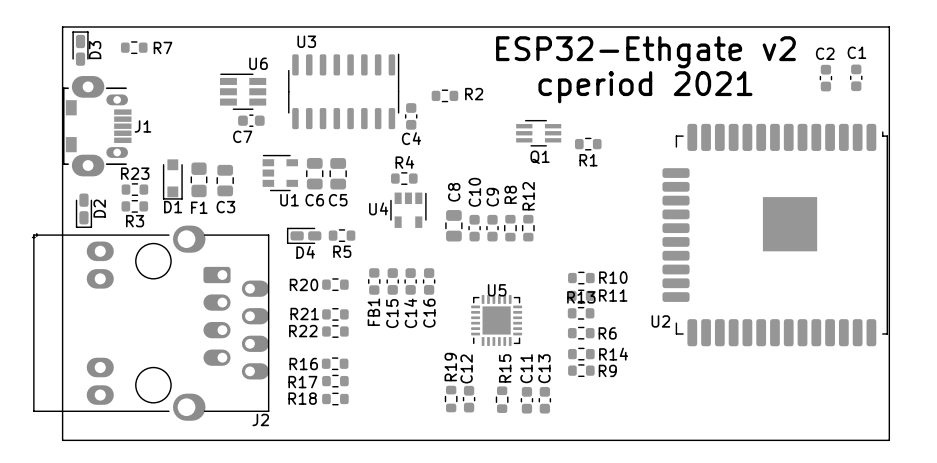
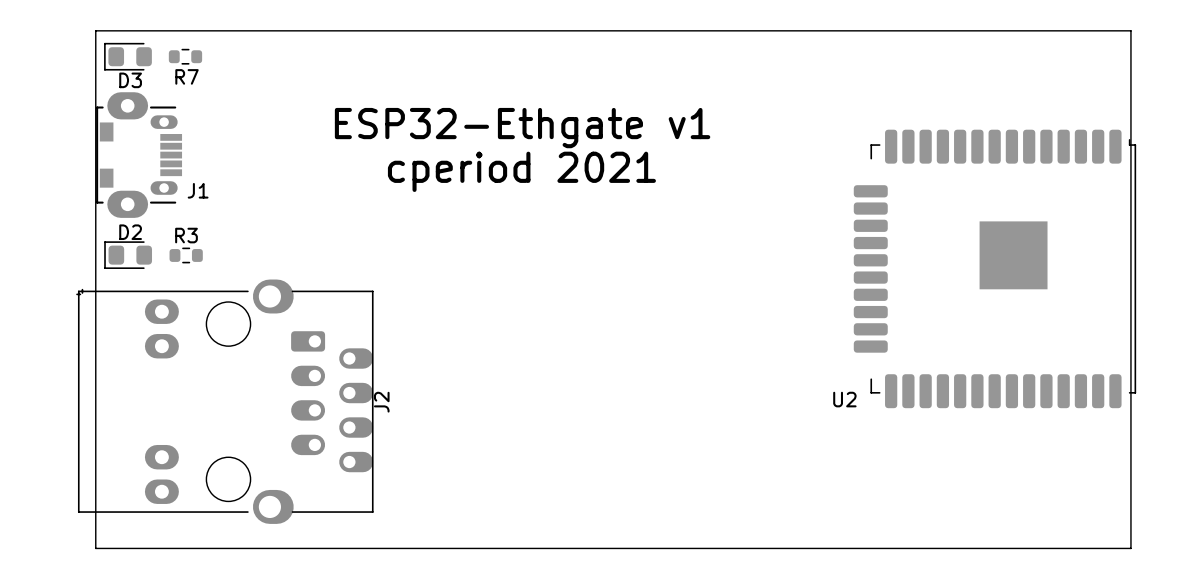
D3 footprint: [72, 31, 89, 66] -> [104, 42, 152, 71]
R7 name position: R7 (163, 47) -> R7 (187, 76)
D3 name position: D3 (95, 50) -> D3 (130, 80)
text: ESP32-Ethgate v2 (645, 52) -> none
C1: (856, 77) -> none
C2: (825, 78) -> none
text position: cperiod 2021 (645, 87) -> cperiod 2021 (521, 171)
U6: (243, 91) -> none
U3: (343, 91) -> none
R2: (444, 95) -> none
text: none -> ESP32-Ethgate v1 (522, 128)
C4: (411, 116) -> none
C7: (251, 120) -> none
J1 name position: J1 (142, 126) -> J1 (198, 190)
Q1: (538, 133) -> none
R1: (588, 144) -> none
U1: (280, 173) -> none
C6: (314, 173) -> none
C5: (338, 173) -> none
R4: (404, 178) -> none
D1: (172, 179) -> none
F1: (199, 179) -> none
C3: (225, 180) -> none
R23: (134, 189) -> none
D2 footprint: [75, 193, 93, 228] -> [104, 241, 153, 269]
U4: (408, 210) -> none
R3 name position: R3 (135, 221) -> R3 (186, 235)
C8: (453, 225) -> none
C10: (474, 228) -> none
C9: (492, 228) -> none
R8: (510, 228) -> none
R12: (528, 228) -> none
D4: (304, 235) -> none
R5: (342, 235) -> none
U2 position: (775, 235) -> (994, 268)
R10: (581, 278) -> none
FB1: (374, 281) -> none
C15: (392, 281) -> none
C14: (410, 281) -> none
C16: (429, 281) -> none
R20: (335, 284) -> none
R11: (581, 295) -> none
R13: (581, 313) -> none
R21: (335, 314) -> none
U5: (496, 320) -> none
J2 position: (150, 323) -> (224, 401)
R22: (335, 331) -> none
R6: (581, 333) -> none
R14: (581, 354) -> none
R16: (335, 363) -> none
R9: (581, 370) -> none
R17: (335, 381) -> none
R18: (335, 399) -> none
R19: (451, 399) -> none
C12: (469, 399) -> none
R15: (502, 399) -> none
C11: (526, 400) -> none
C13: (544, 400) -> none
J2 name rotation: 0° (260, 419) -> 90° counterclockwise (381, 402)
J2 name position: J2 (260, 419) -> J2 (381, 402)

